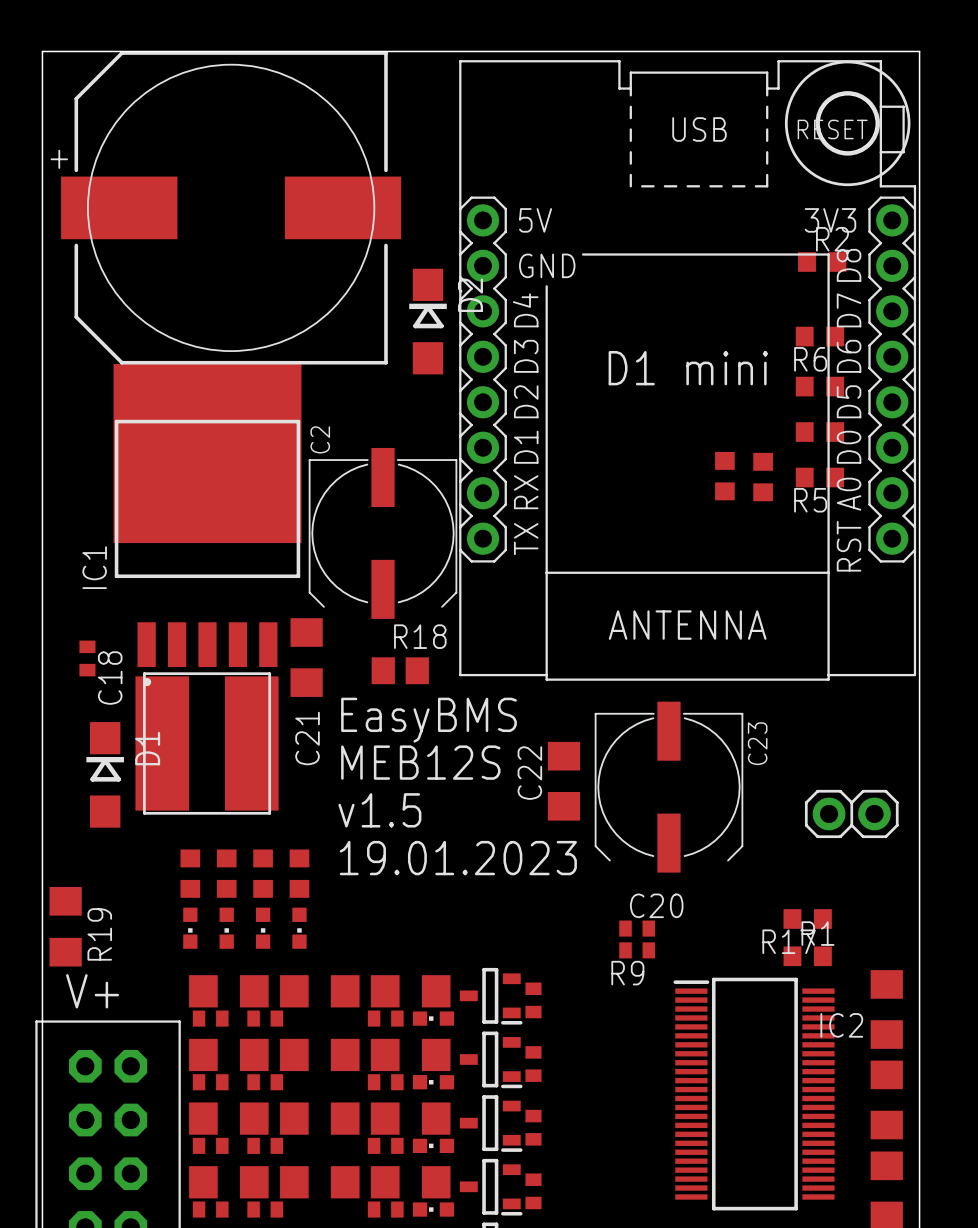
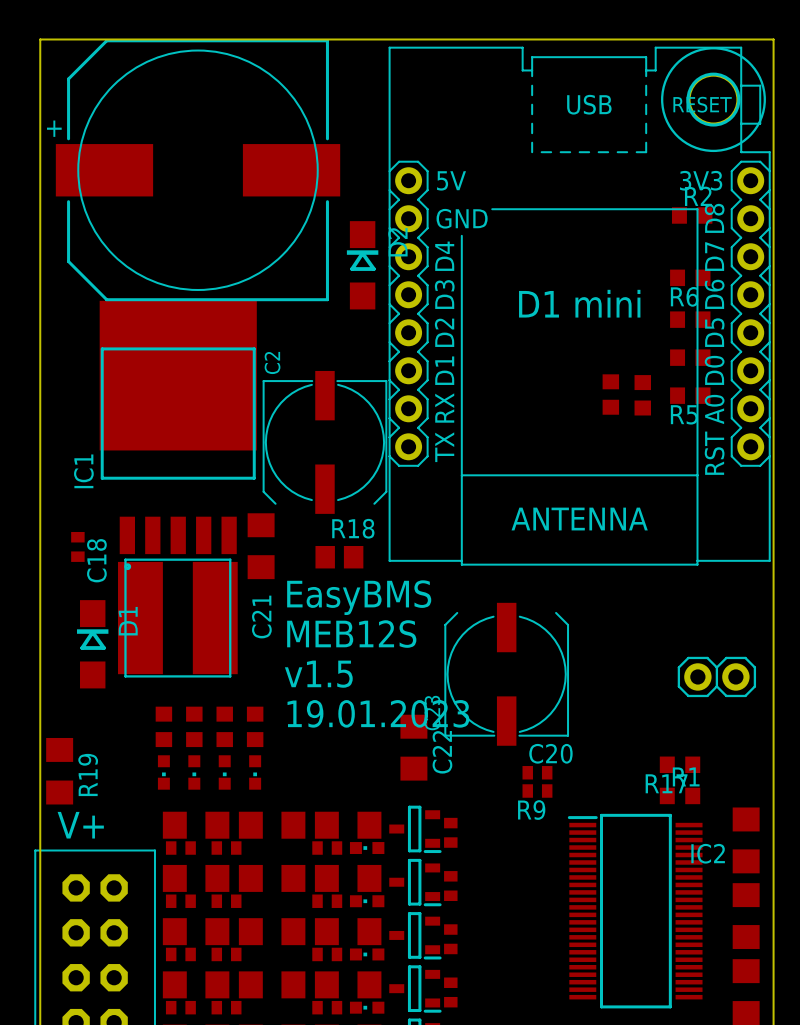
C22 name position: C22 (529, 773) -> C22 (442, 752)
C22 position: (563, 781) -> (413, 747)
C23 rotation: 0° (668, 787) -> 180° (506, 674)

